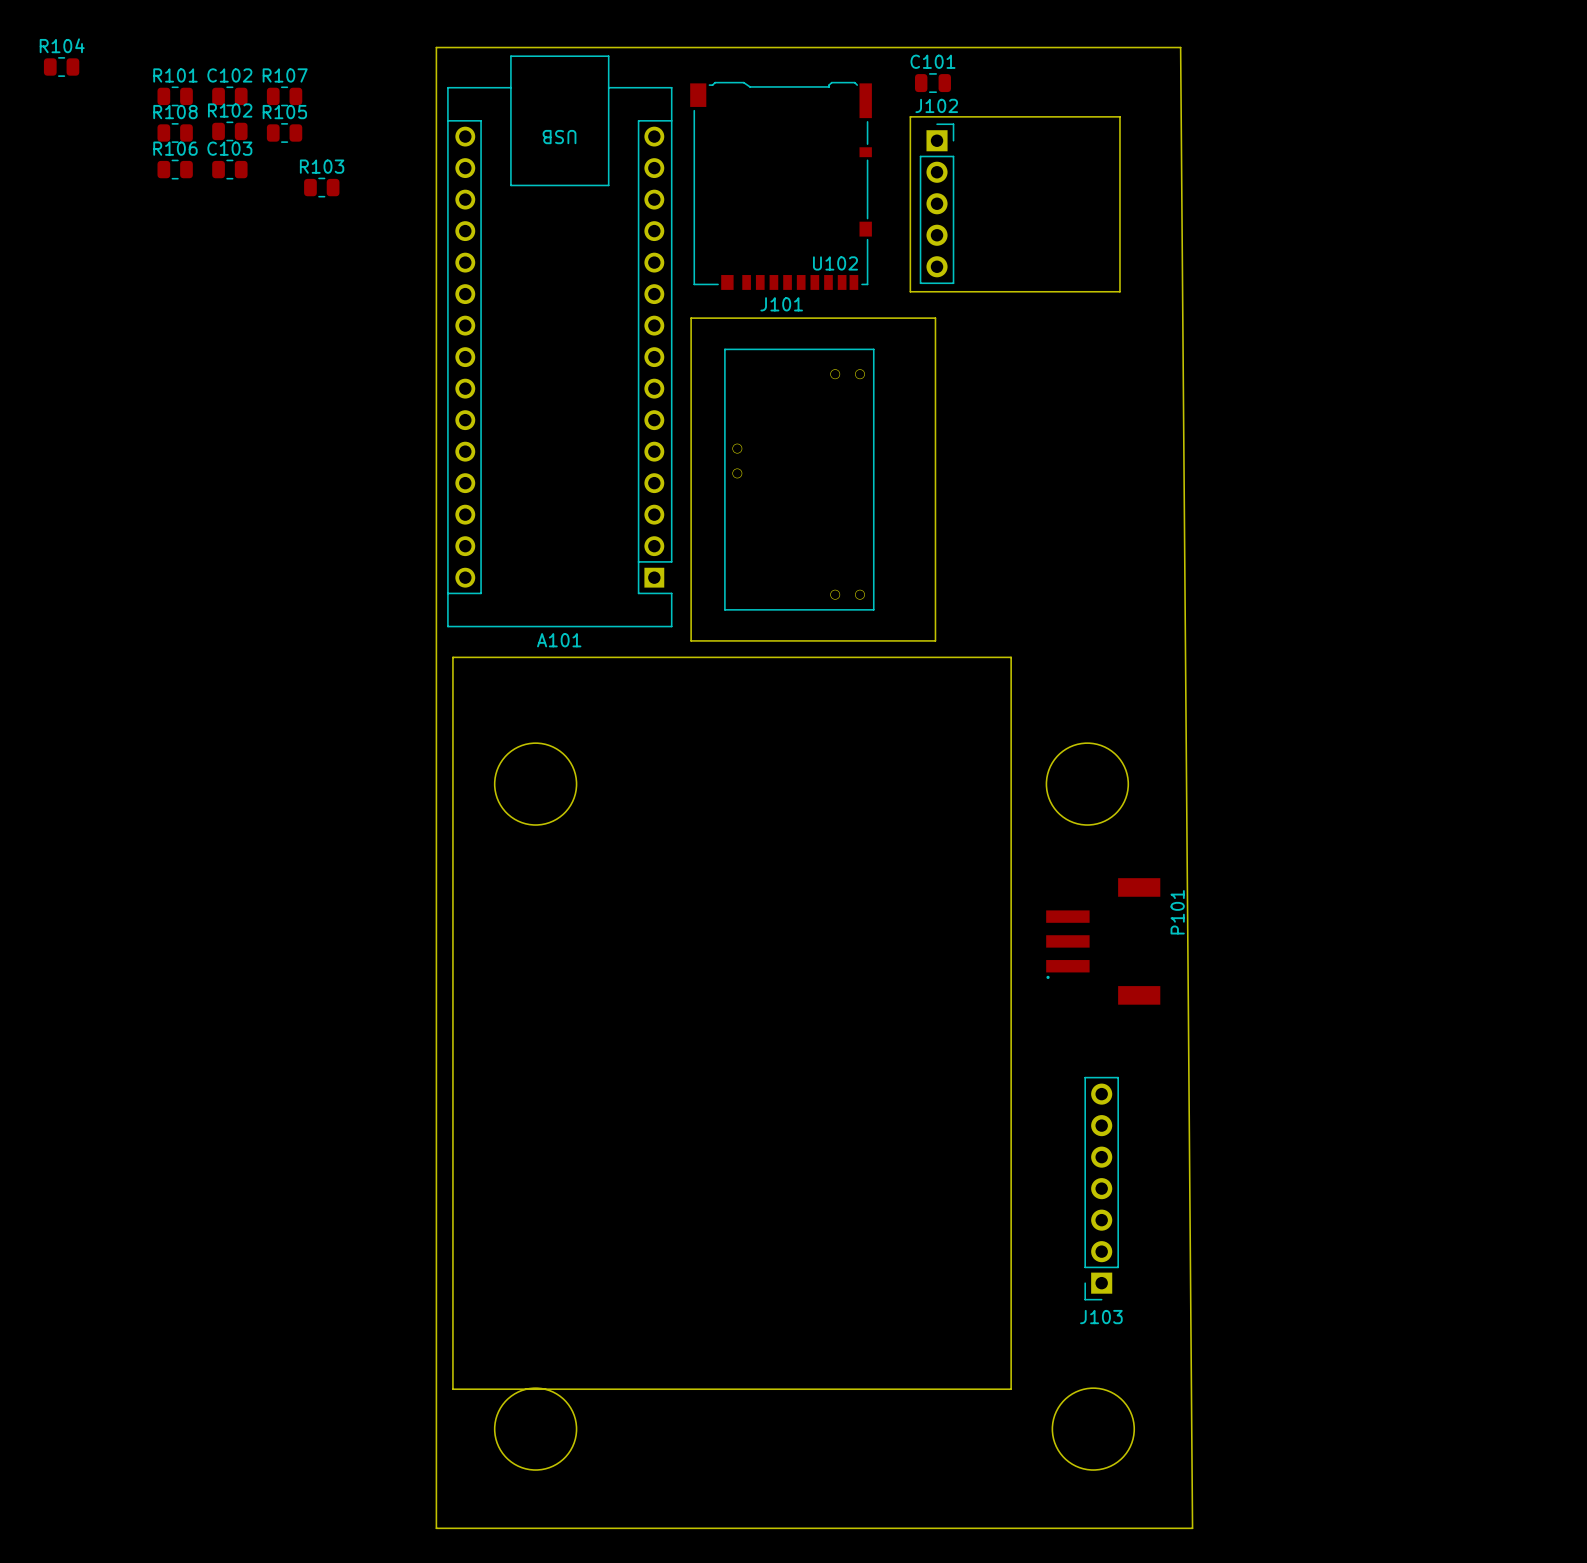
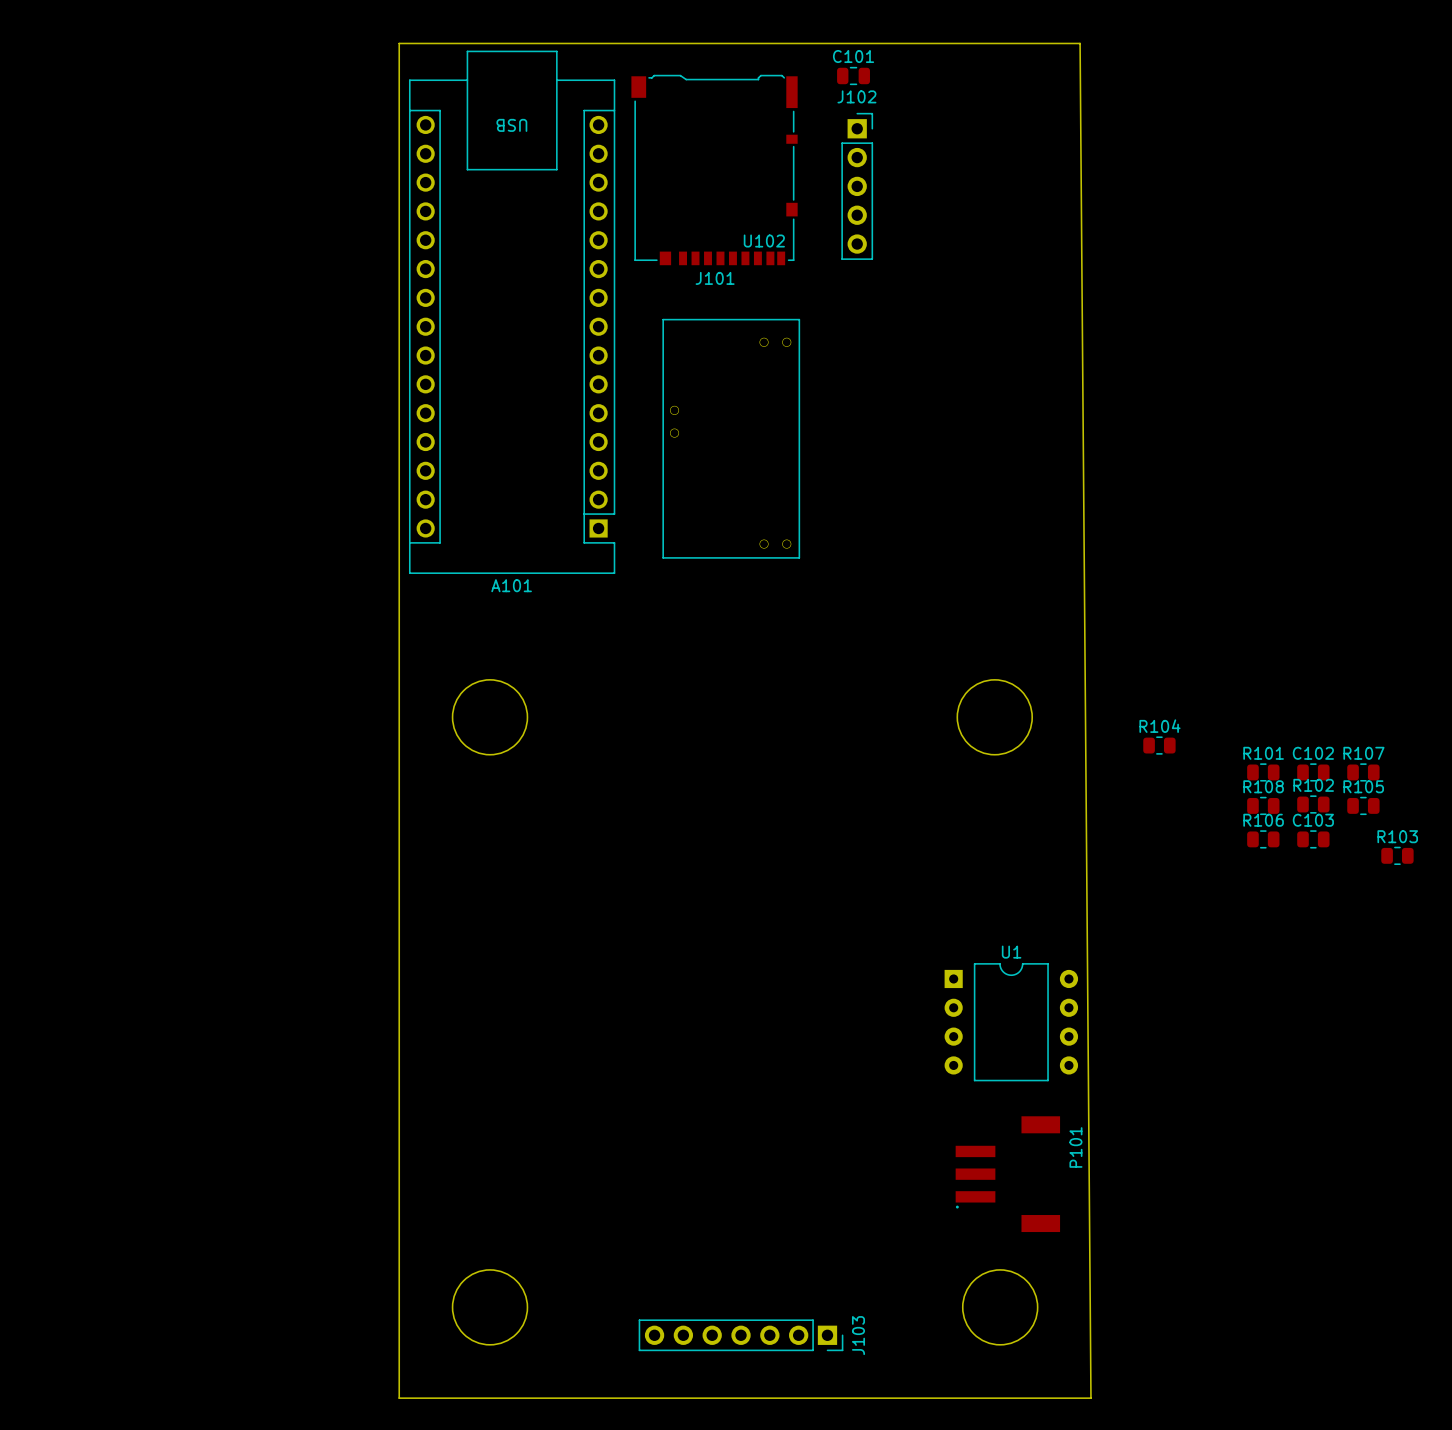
R104 position: (61, 67) -> (1159, 745)
R101 position: (175, 96) -> (1263, 772)
C102 position: (229, 96) -> (1313, 772)
R107 position: (284, 96) -> (1363, 772)
board edge: (910, 116) (1119, 116) (1119, 291) (910, 291) (910, 116) -> none
R102 position: (229, 131) -> (1313, 804)
R108 position: (175, 132) -> (1263, 805)
R105 position: (284, 132) -> (1363, 805)
R106 position: (175, 169) -> (1263, 839)
C103 position: (229, 169) -> (1313, 839)
R103 position: (321, 187) -> (1397, 855)
board edge: (691, 318) (935, 318) (935, 640) (691, 640) (691, 318) -> none
board edge: (452, 657) (1011, 657) (1011, 1389) (452, 1389) (452, 657) -> none
P101 position: (1103, 941) -> (1007, 1174)
U1: none -> (1011, 1022)
J103 rotation: 0° (1101, 1188) -> 90° counterclockwise (741, 1335)
J103 position: (1101, 1188) -> (741, 1335)

